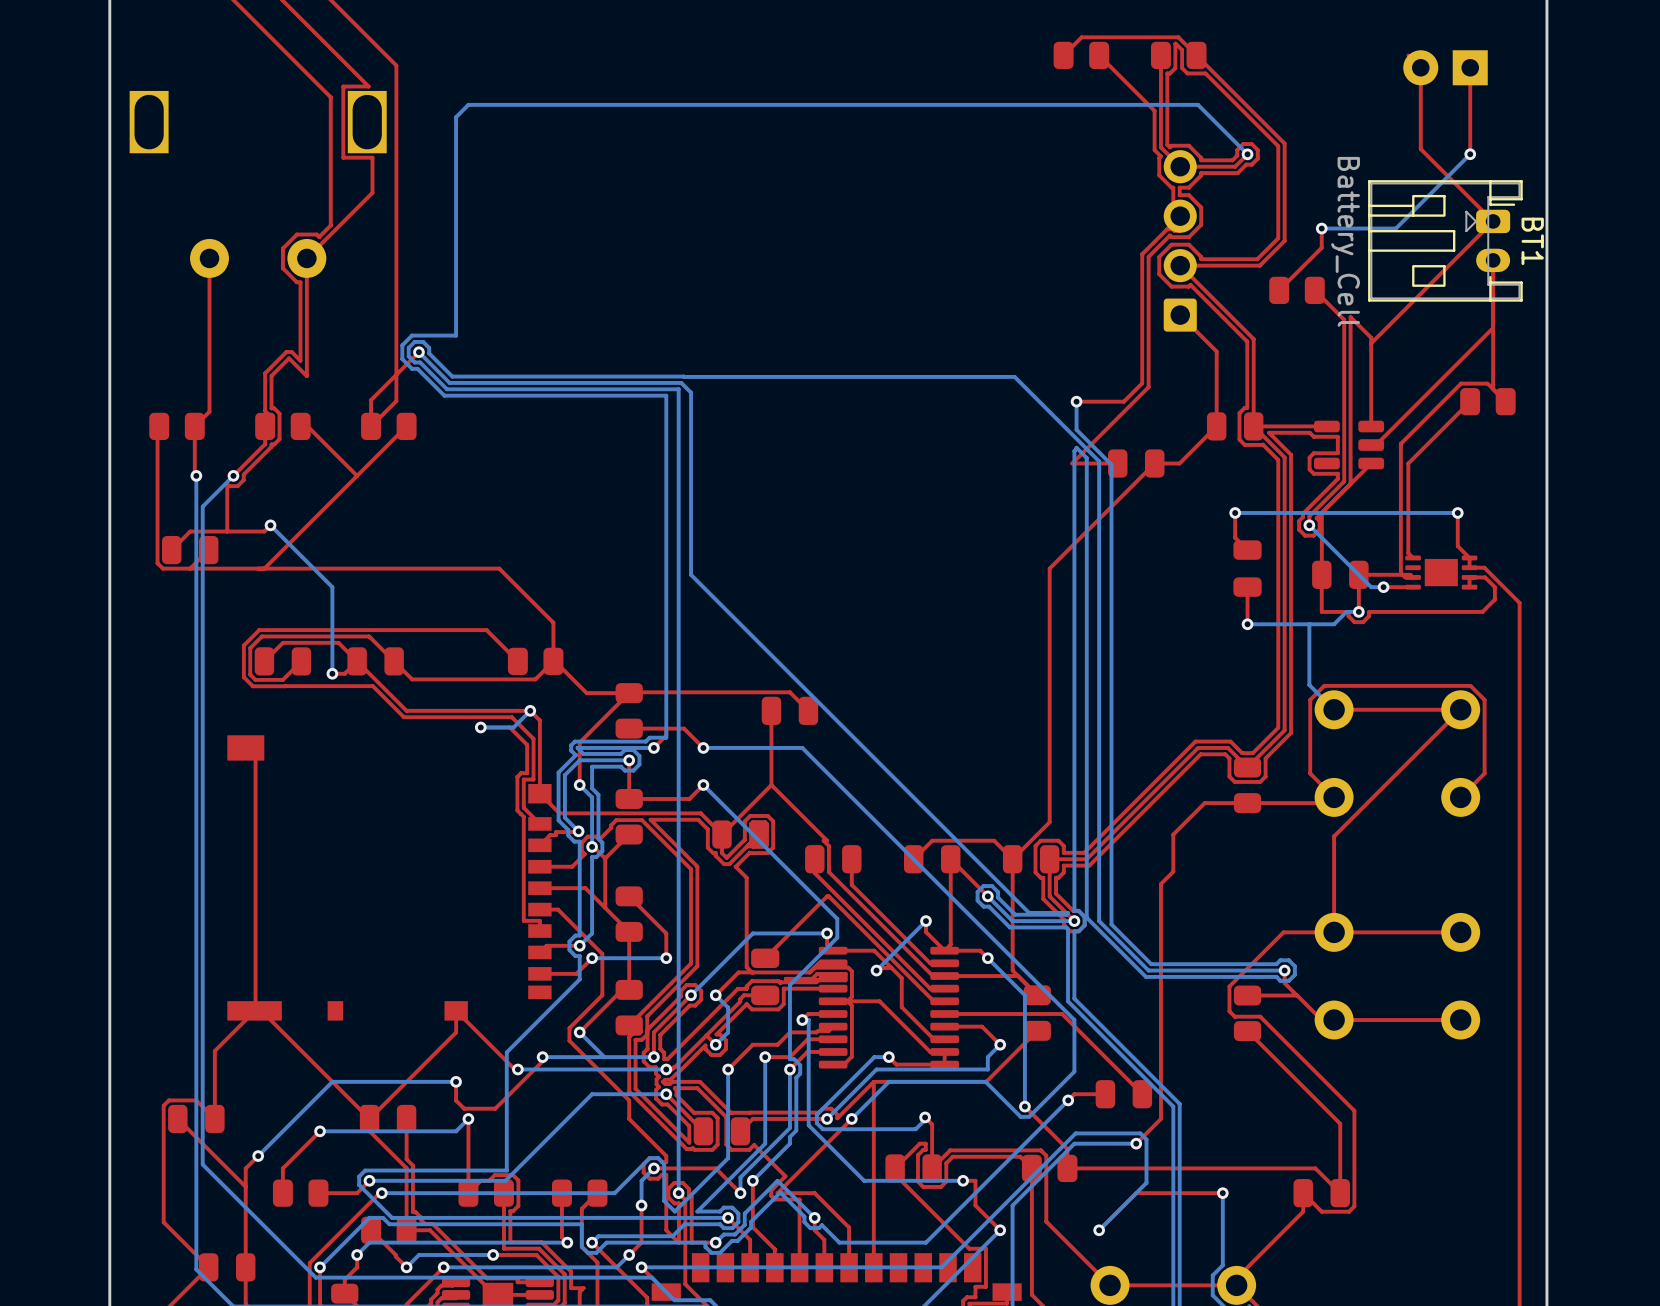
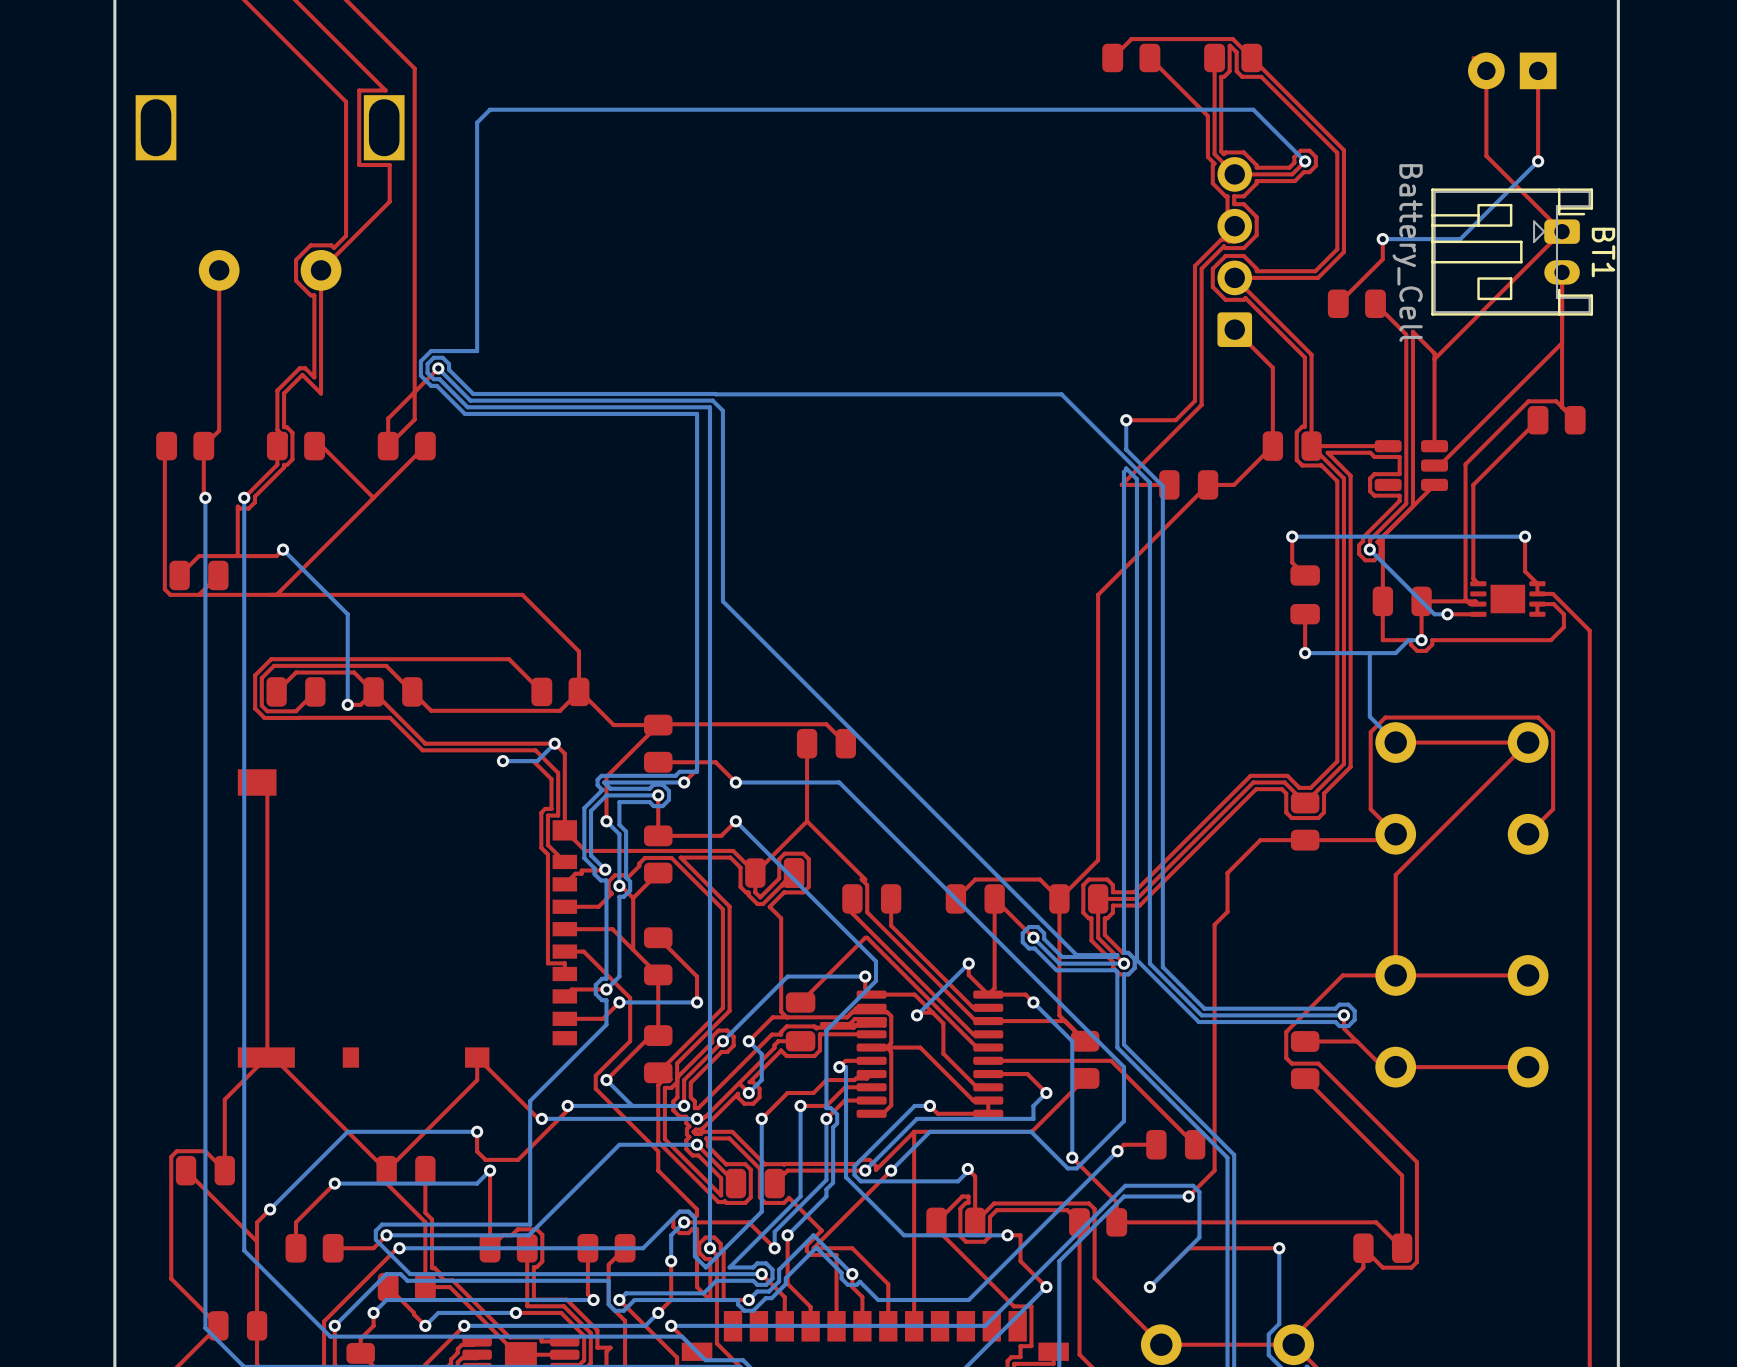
bottom track: (233, 475) (202, 506) (202, 1164) (233, 1195) -> (244, 497) (244, 1250)

